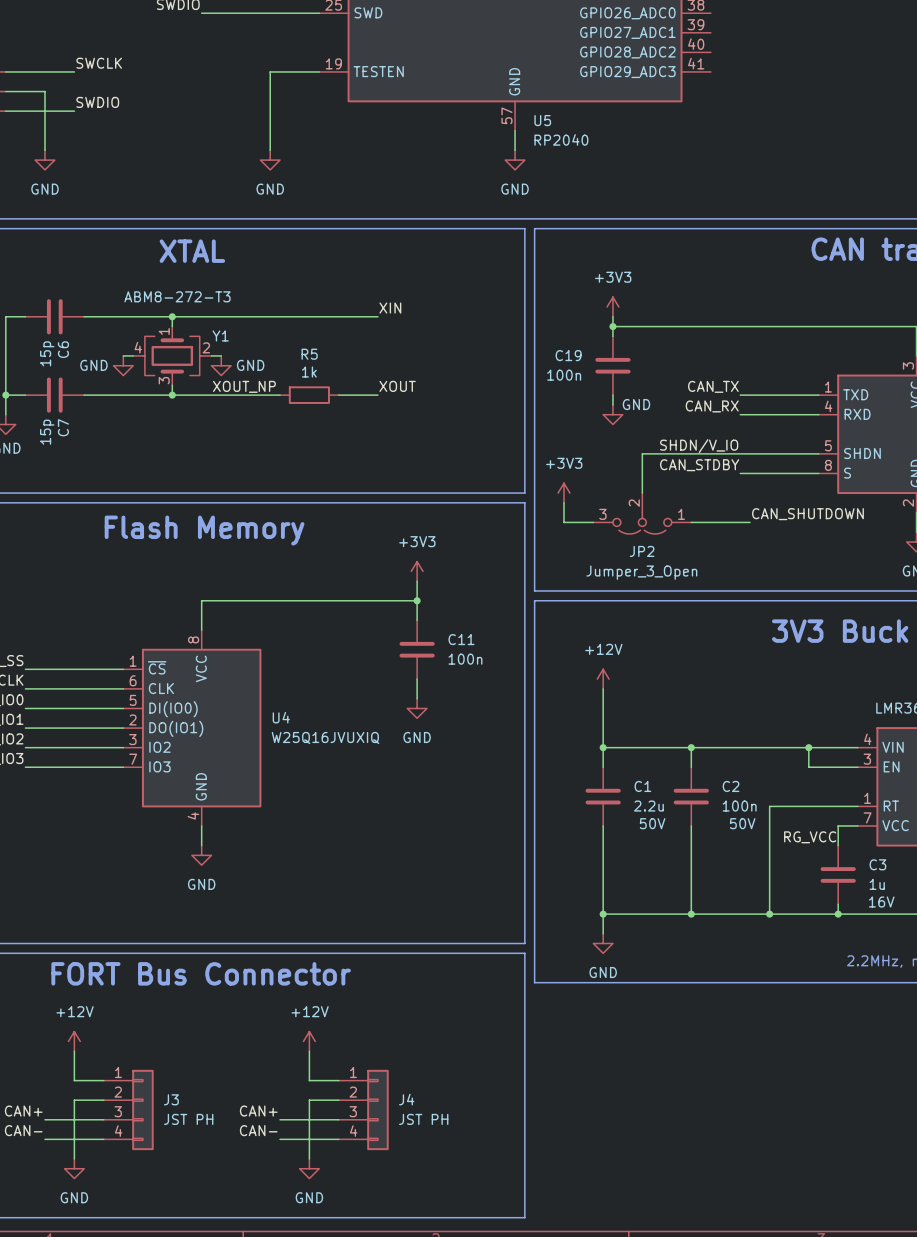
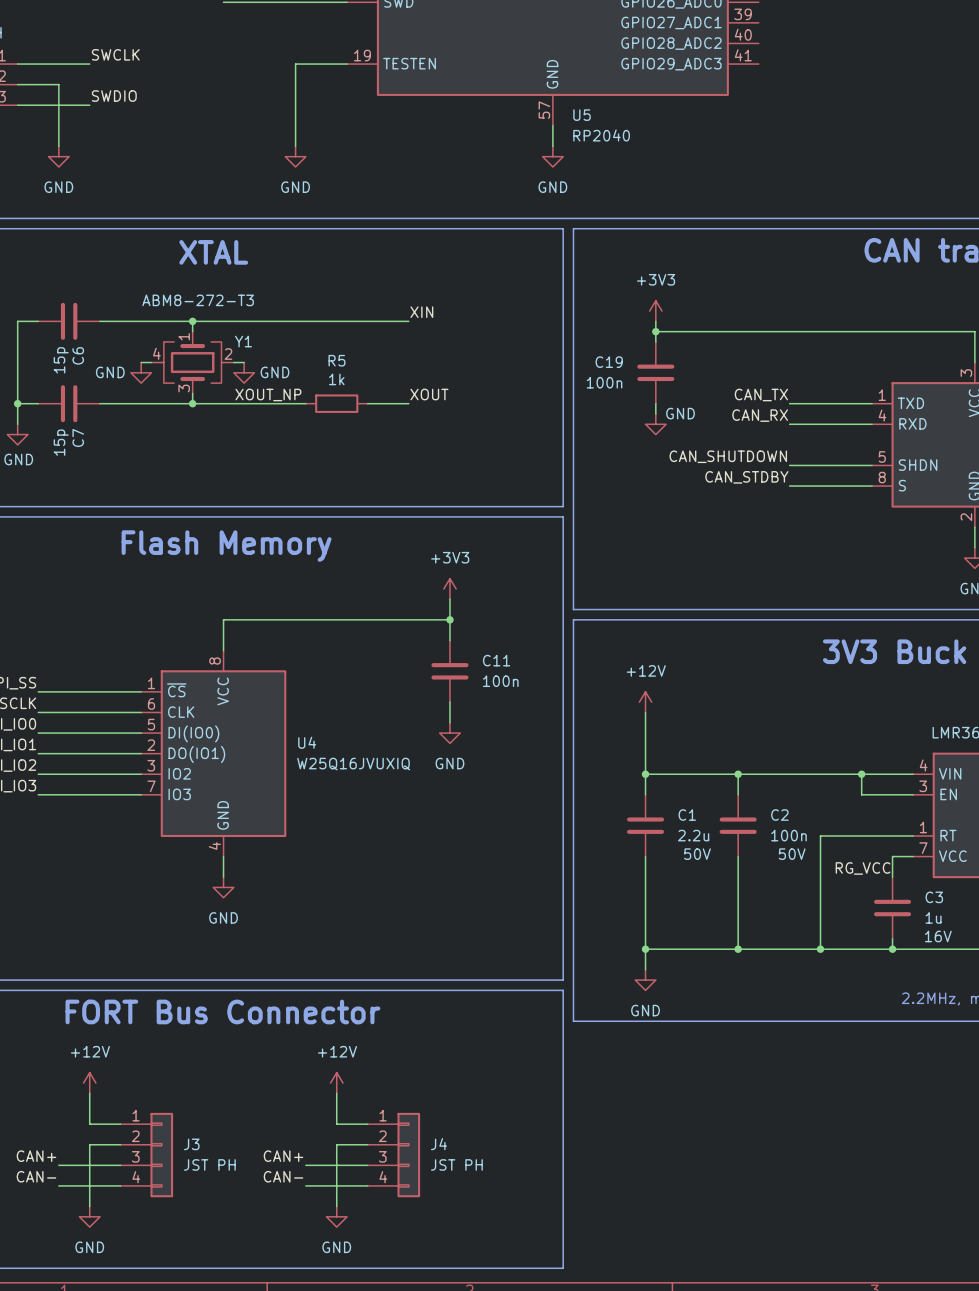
label: SHDN/V_IO (699, 446) -> CAN_SHUTDOWN (728, 456)
wire: (740, 453) (642, 453) (642, 493) -> none
power symbol: +3V3 (564, 493) -> none
wire: (564, 502) (564, 522) (593, 522) -> none
JP2: Jumper_3_Open (642, 513) -> none
label: CAN_SHUTDOWN (807, 514) -> none
wire: (691, 522) (750, 522) -> none

